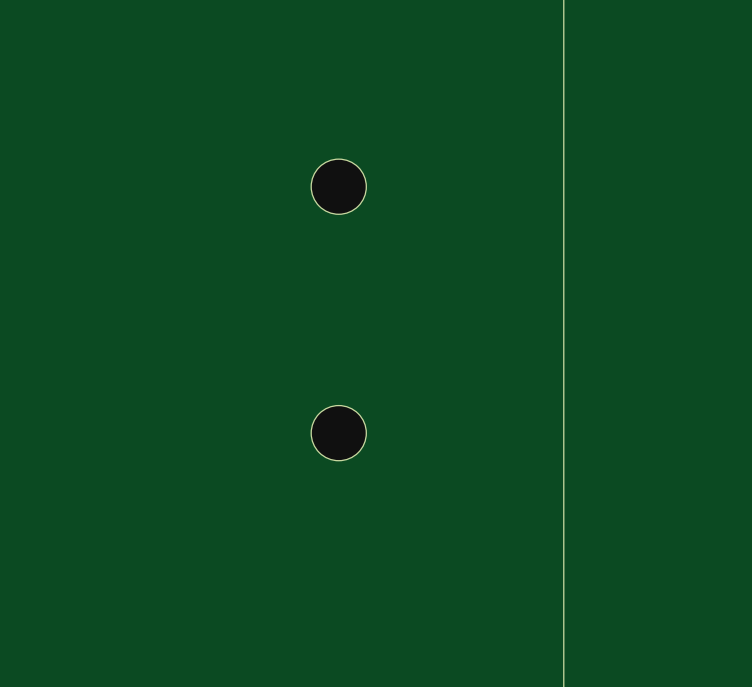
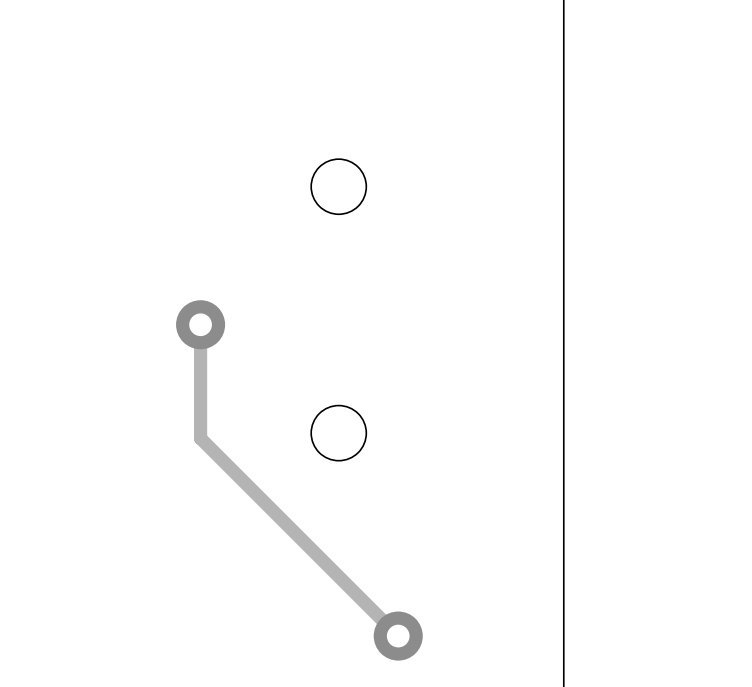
track: none -> (200, 324) (200, 438) (398, 636)
via: none -> (200, 324)
via: none -> (398, 636)

